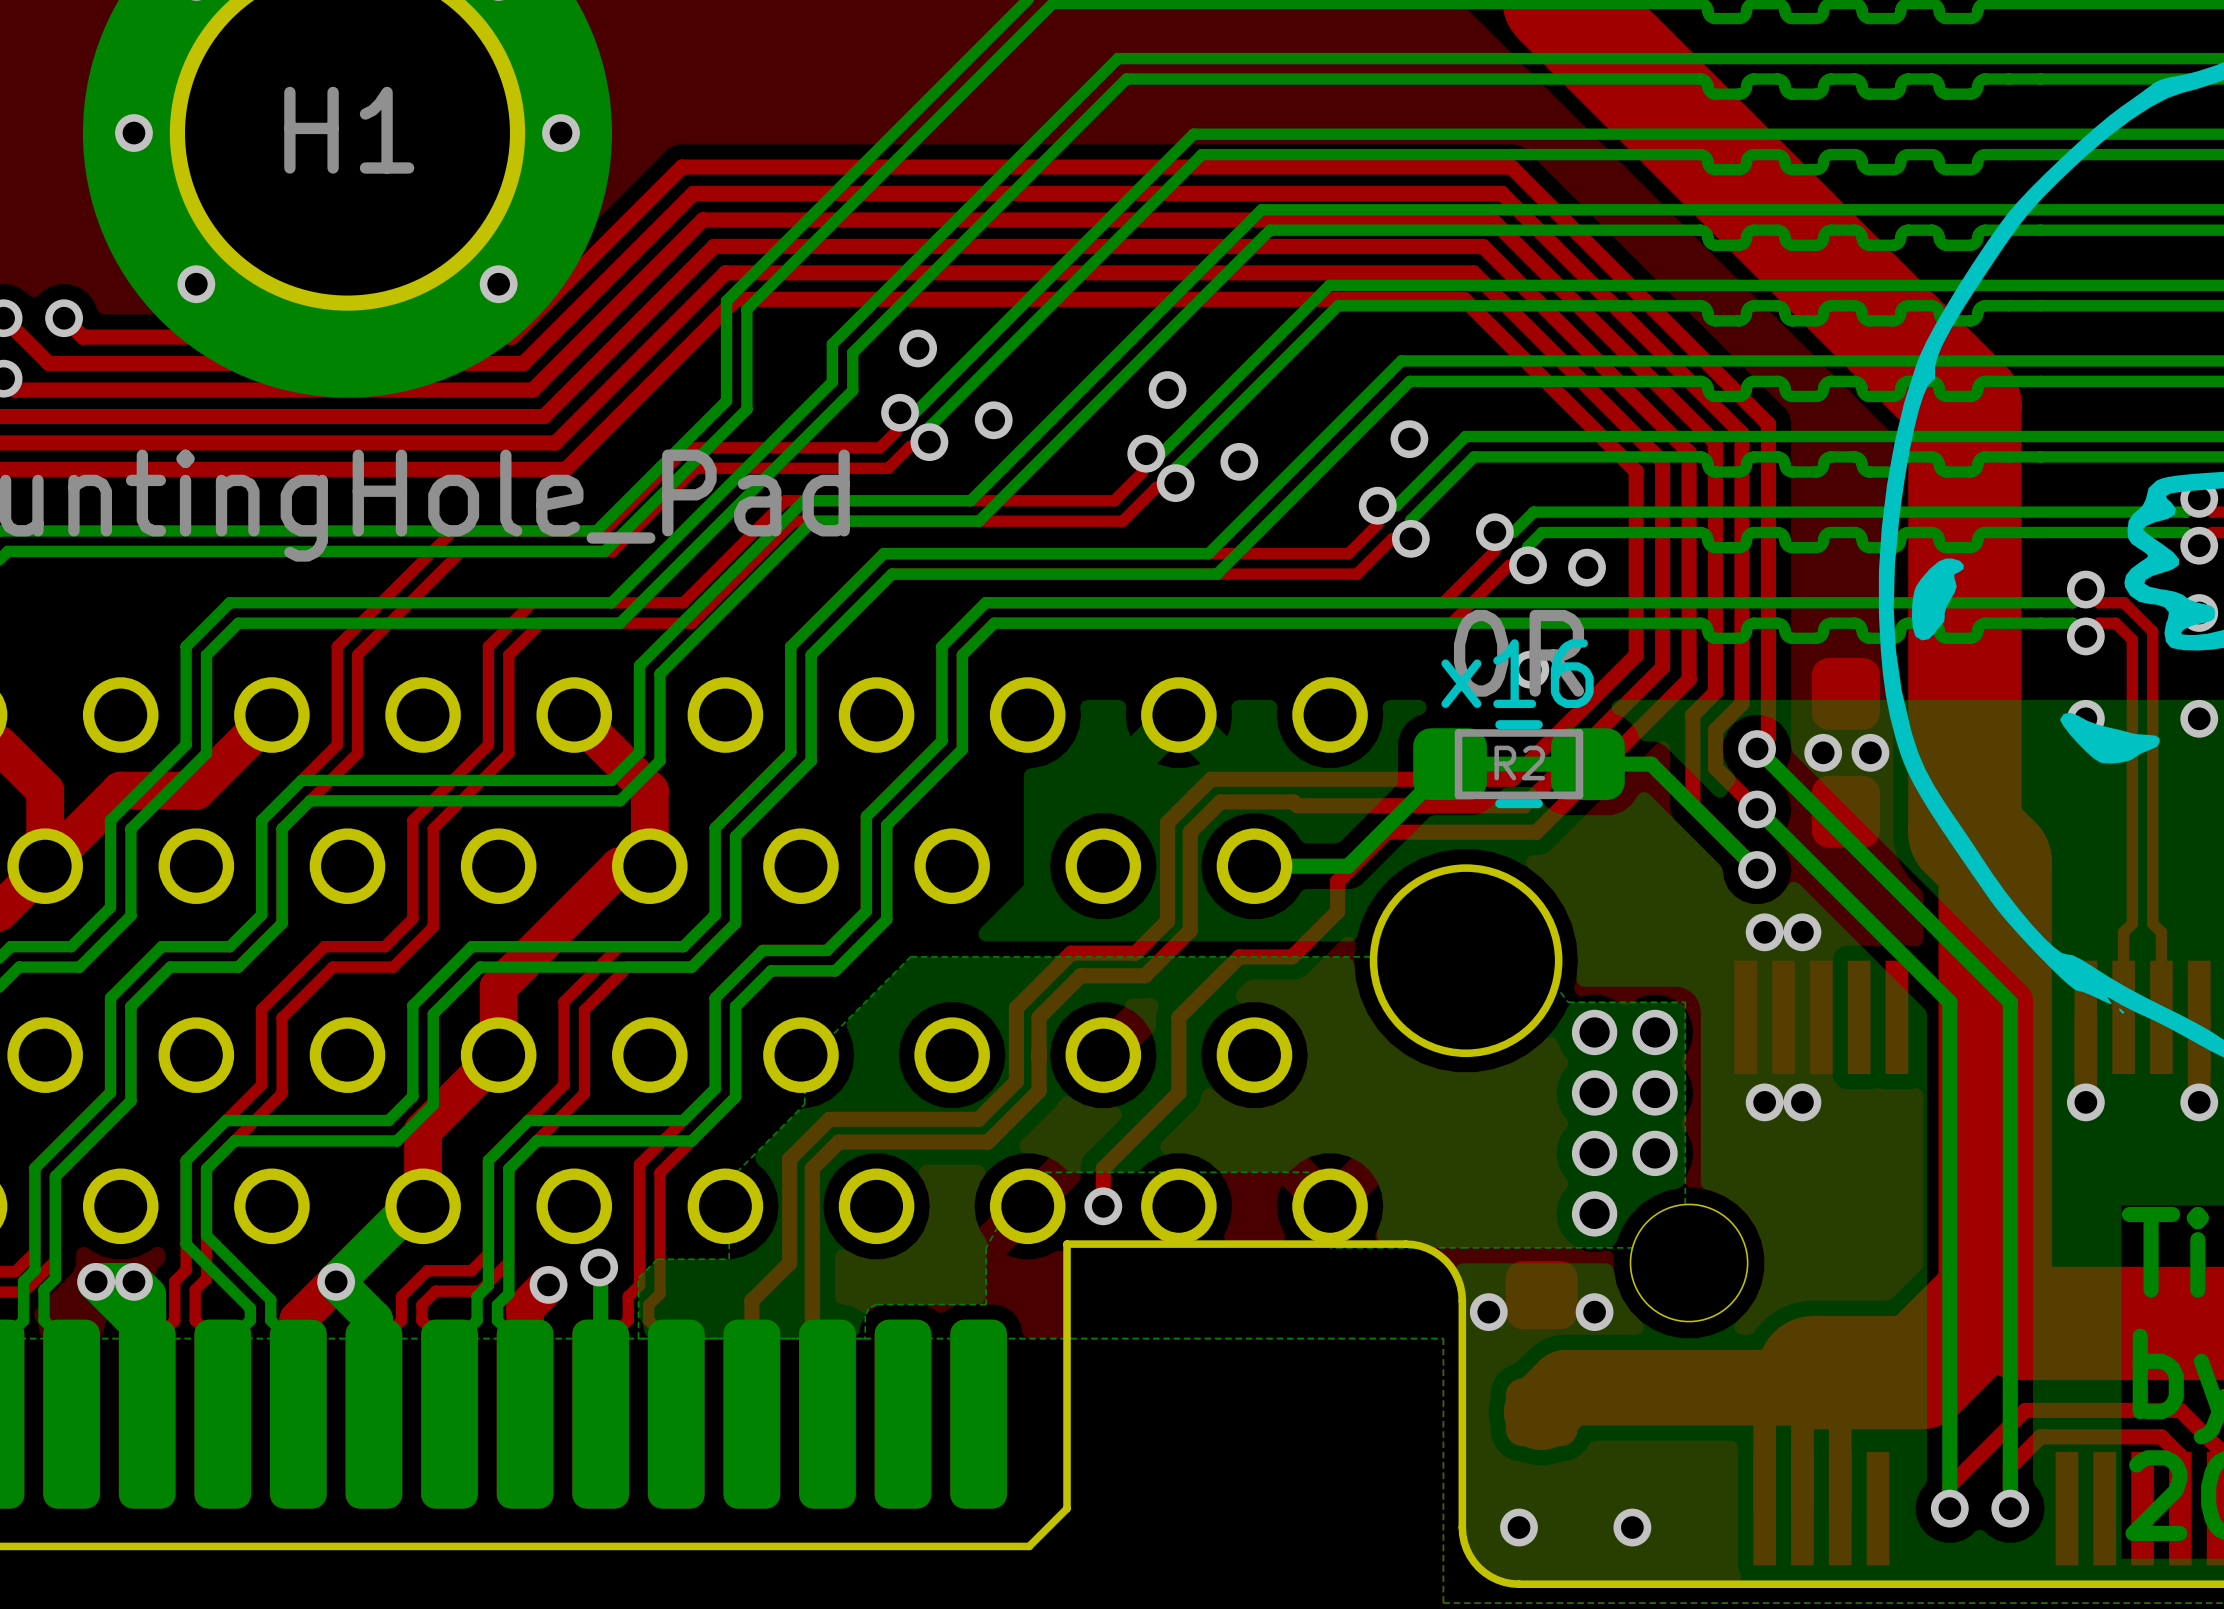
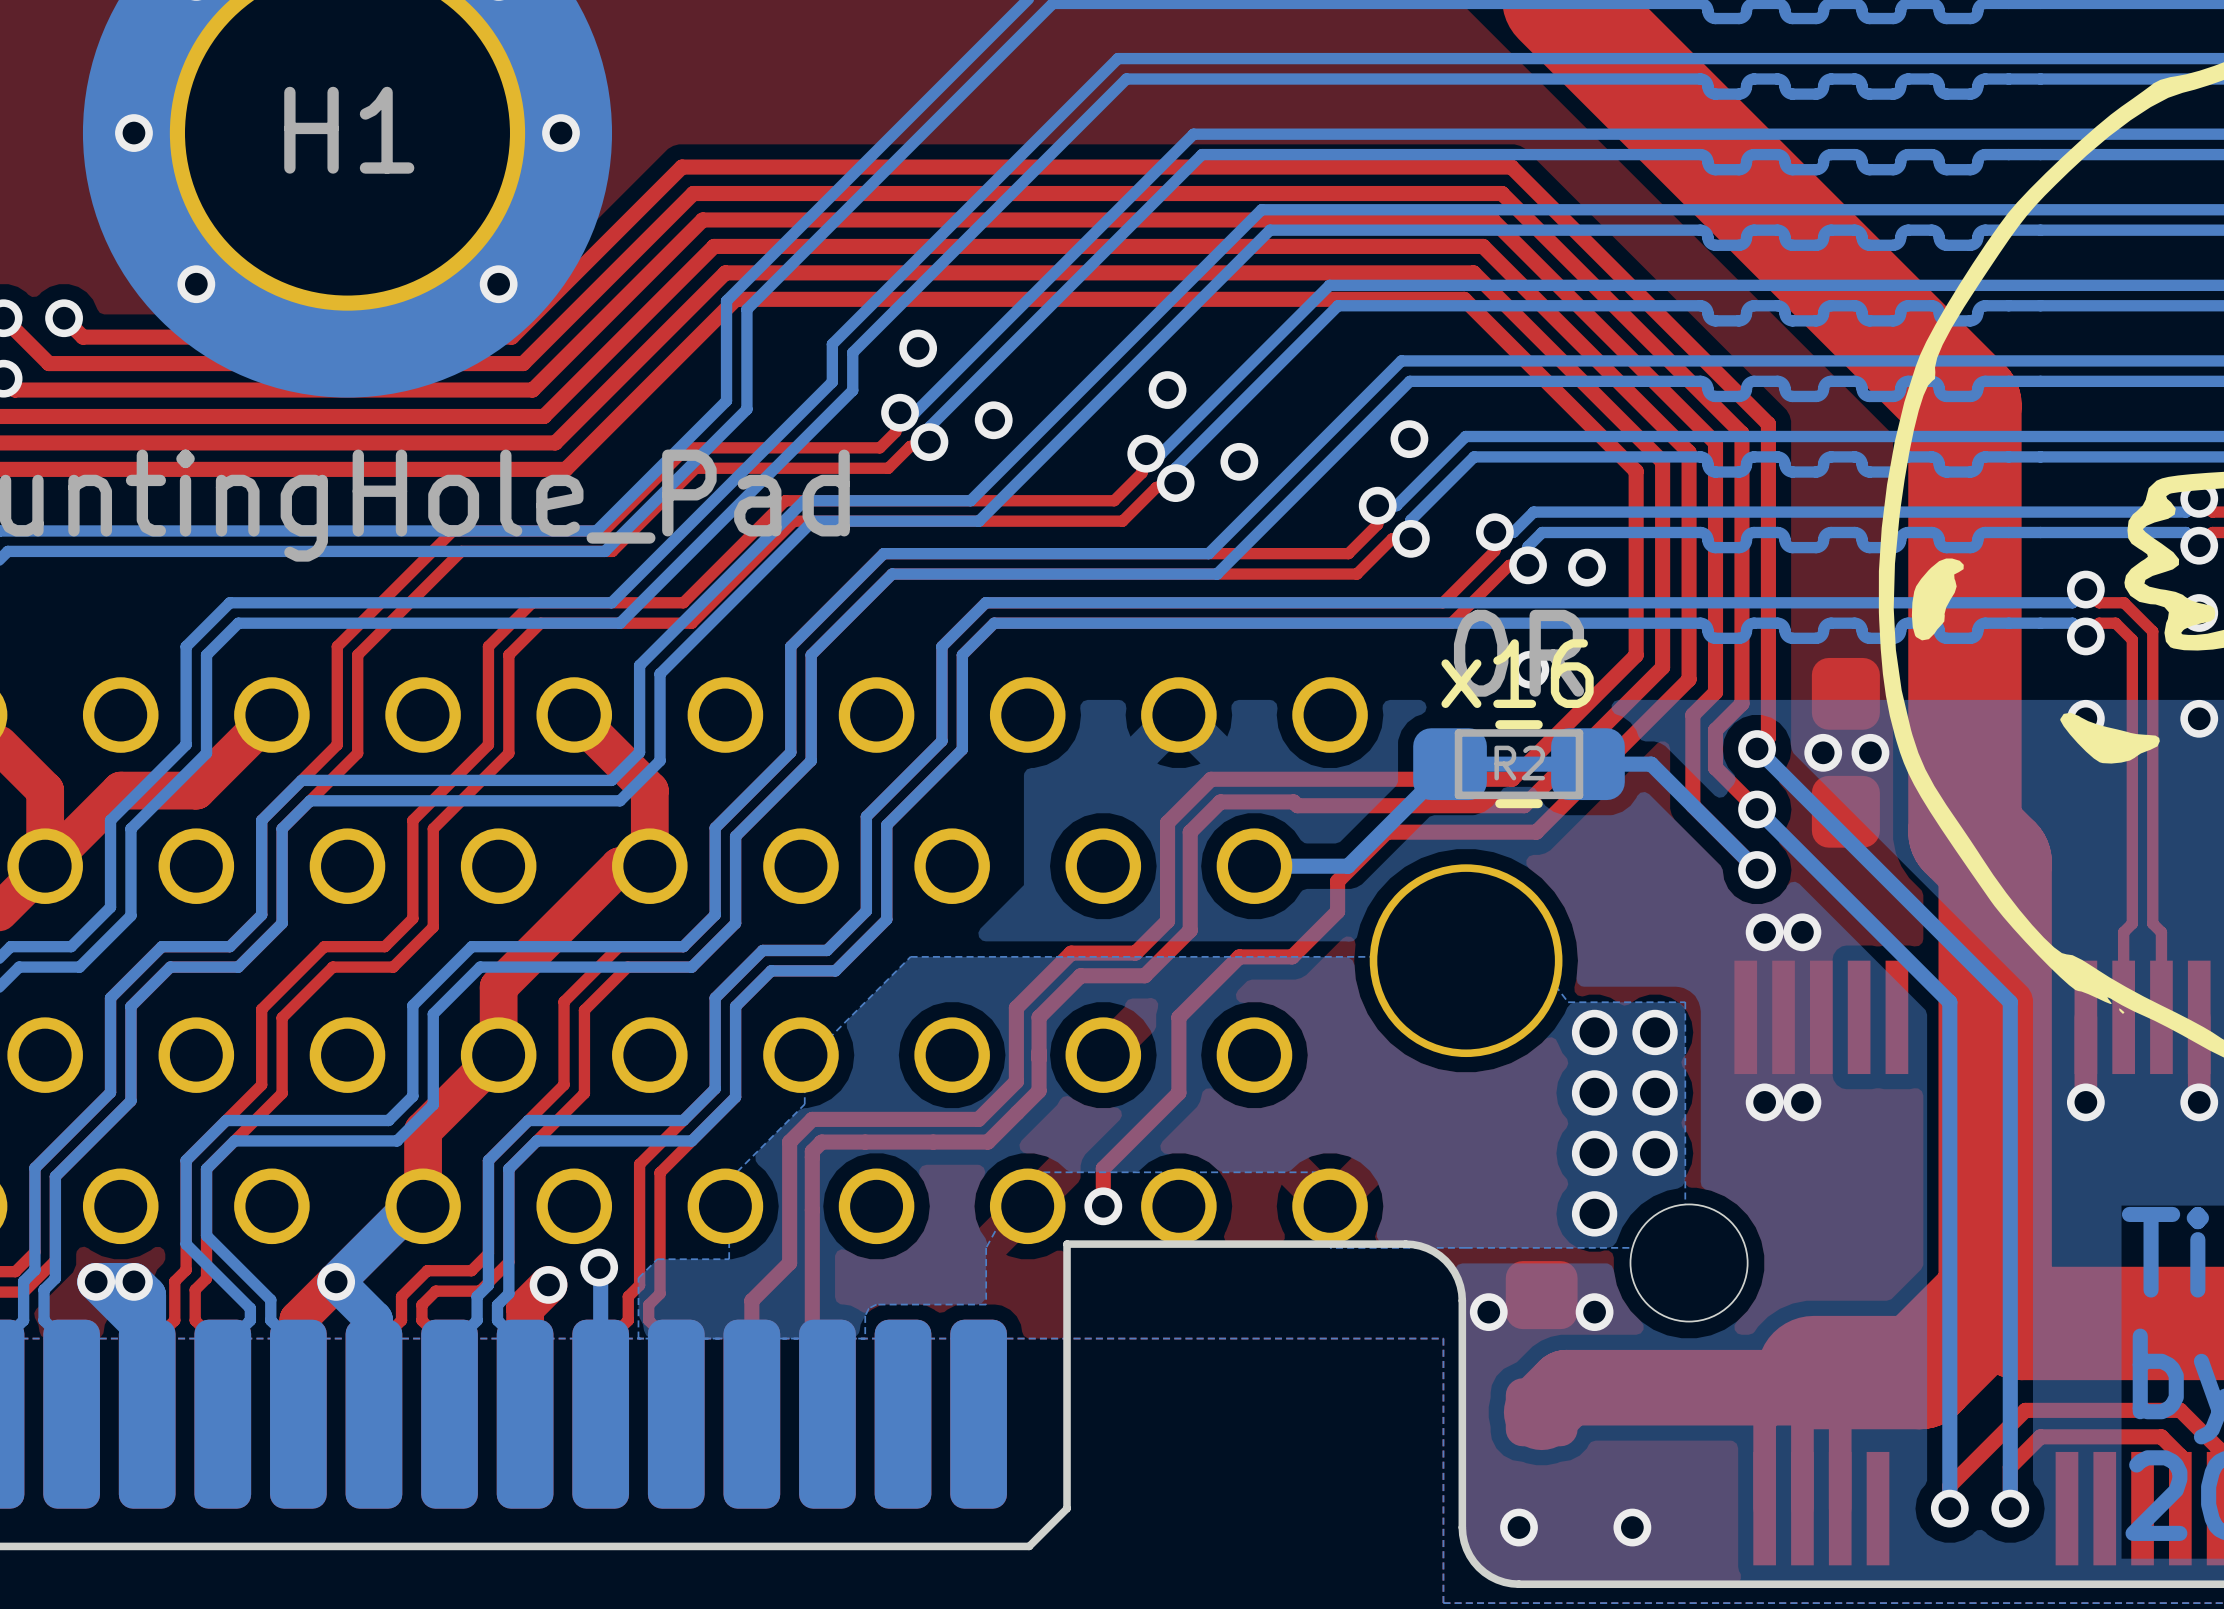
top track: (829, 1119) (789, 1159) -> (829, 1119) (812, 1119) (789, 1142) (789, 1159)
top track: (838, 1142) (812, 1168) -> (838, 1142) (821, 1142) (812, 1151) (812, 1168)

